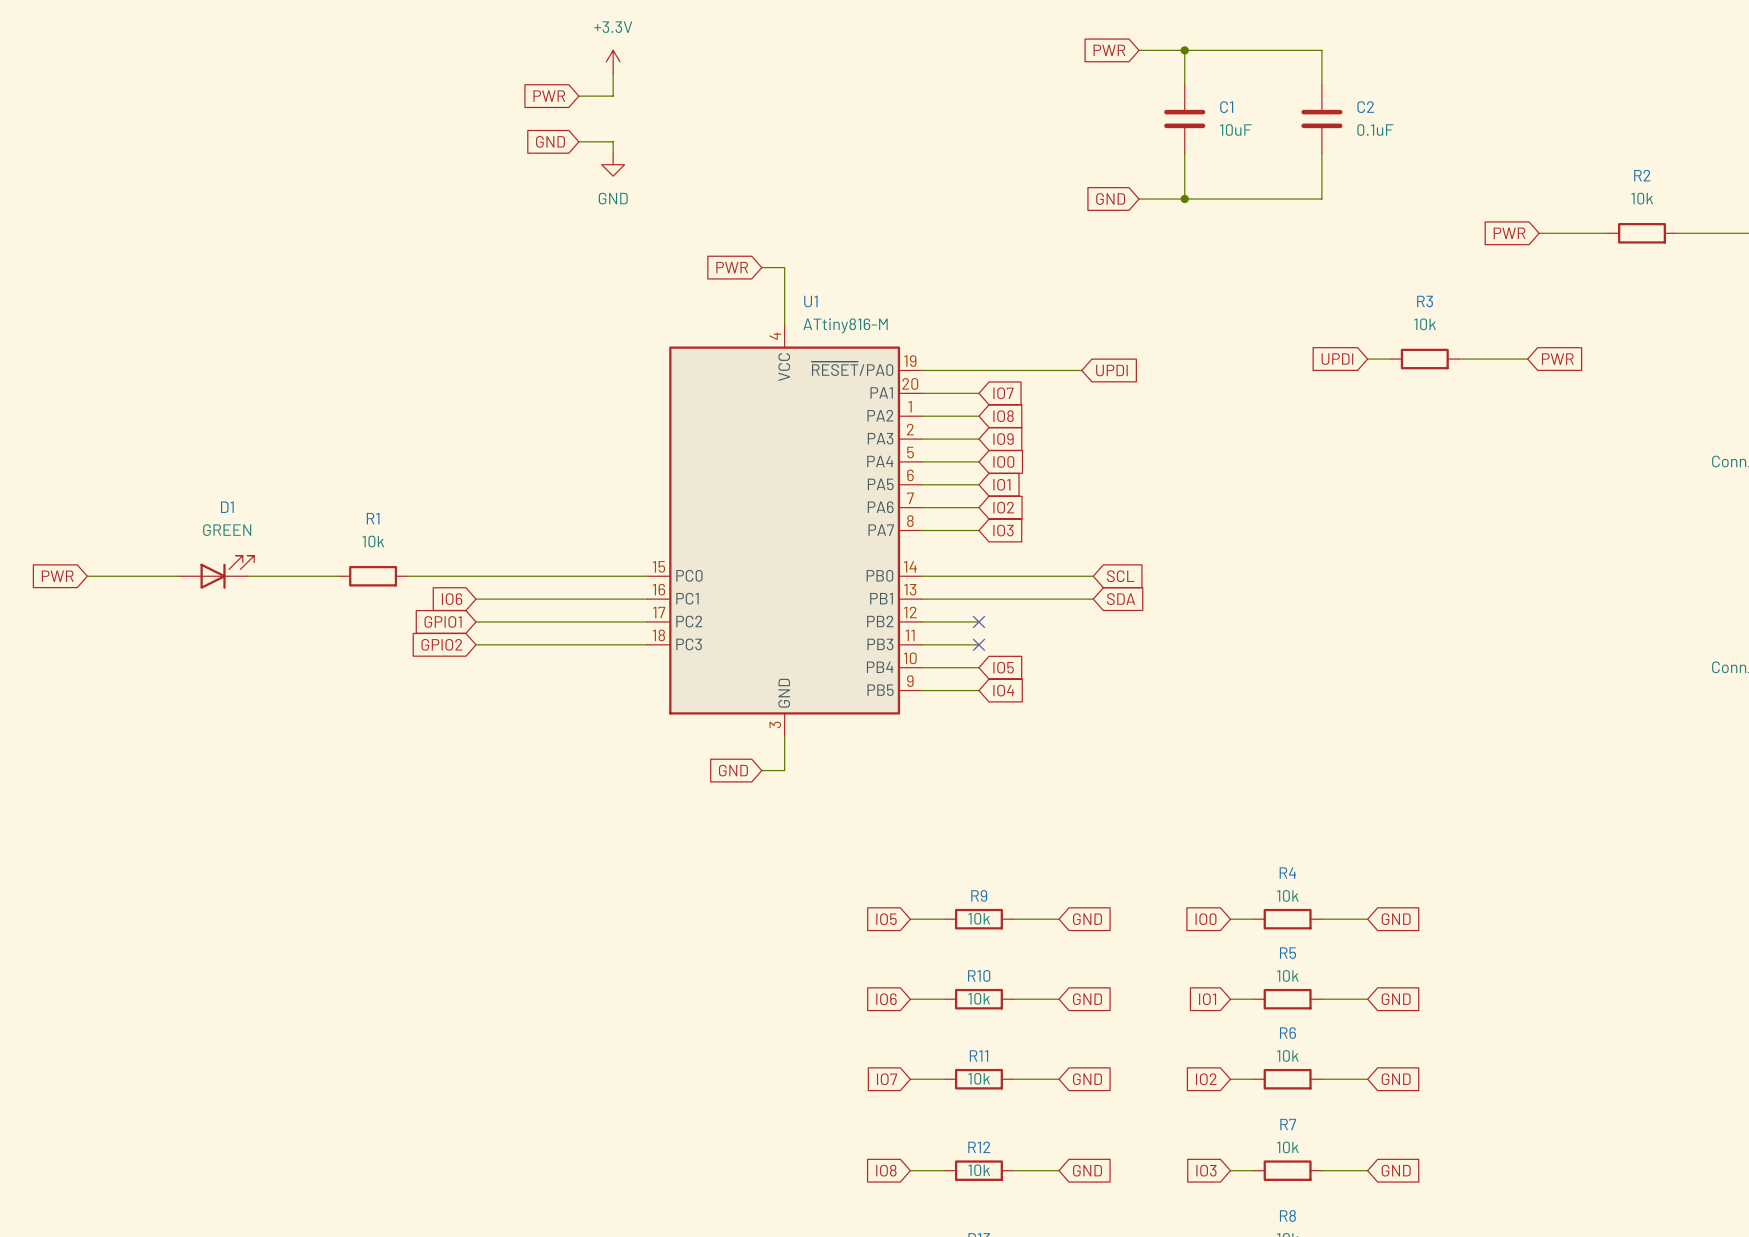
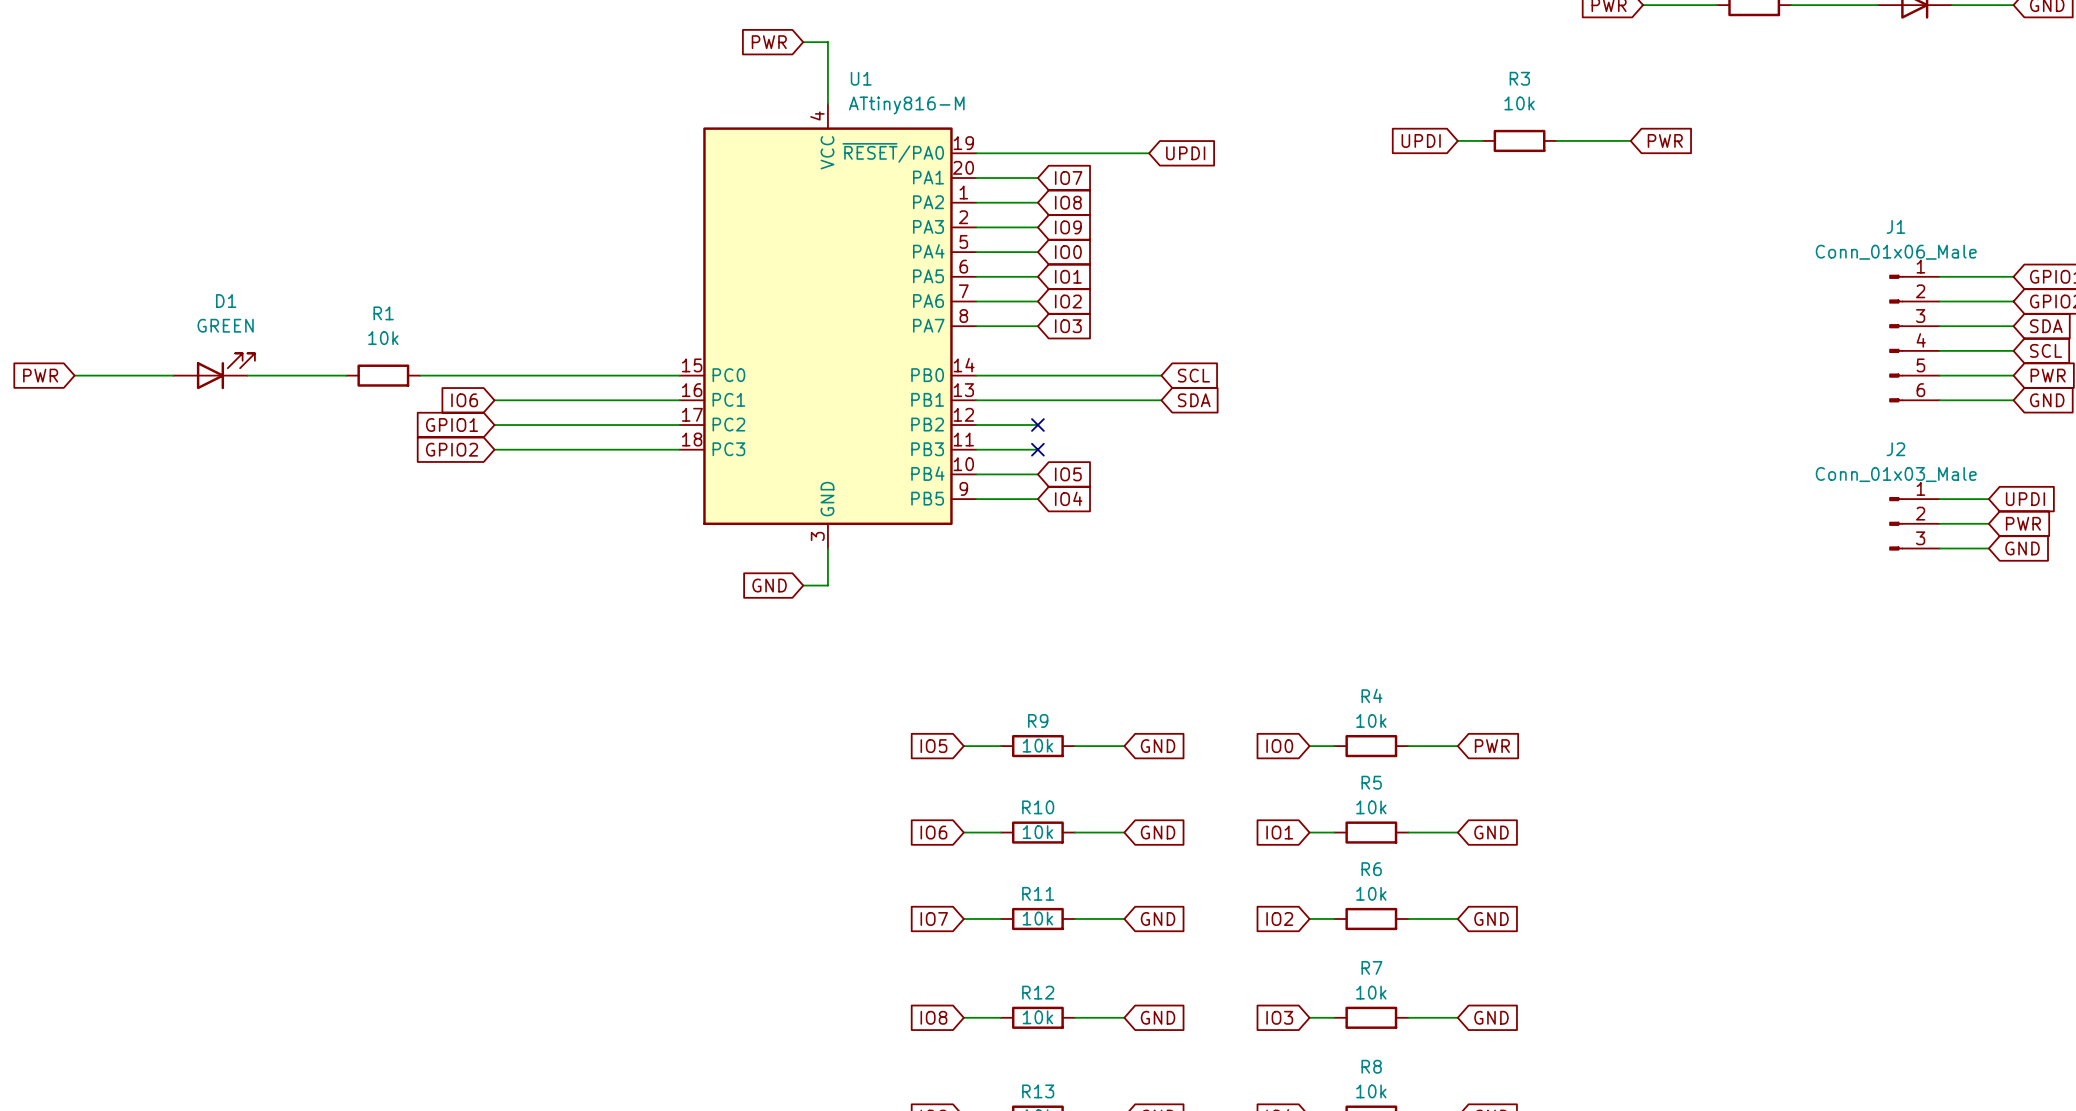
global label: GND (1396, 919) -> PWR (1492, 746)

